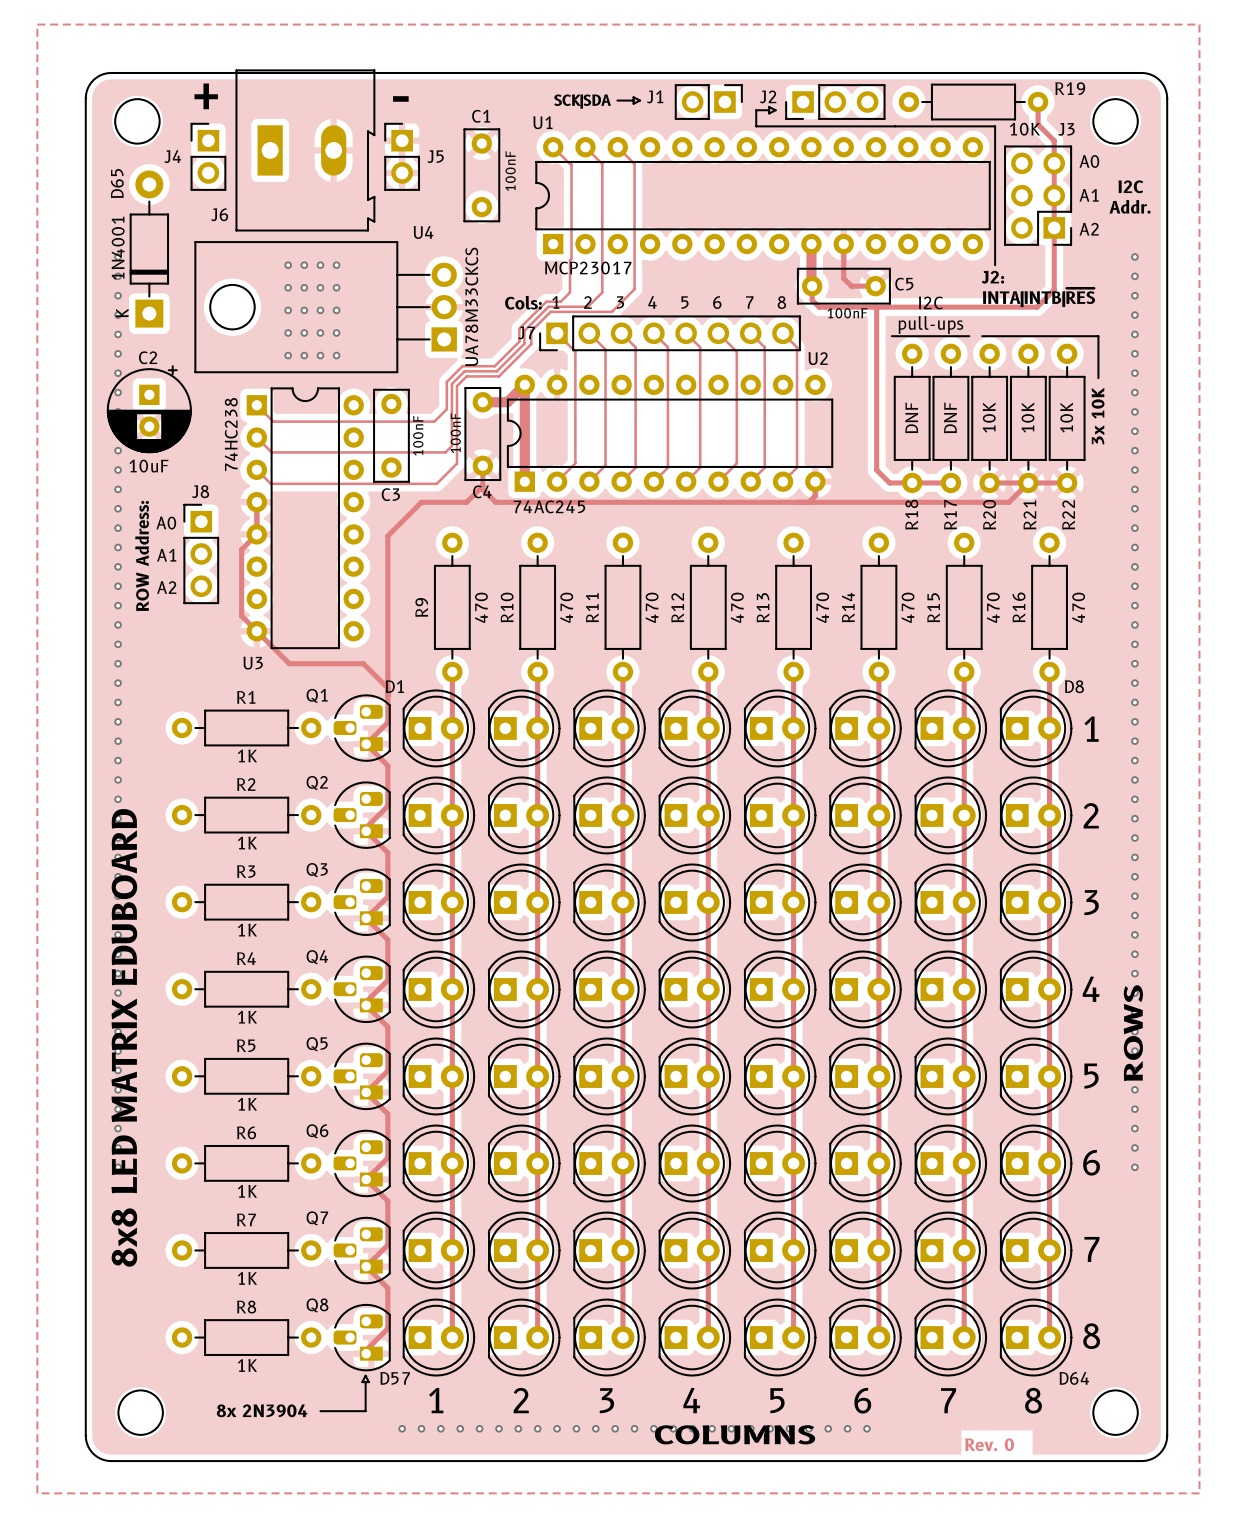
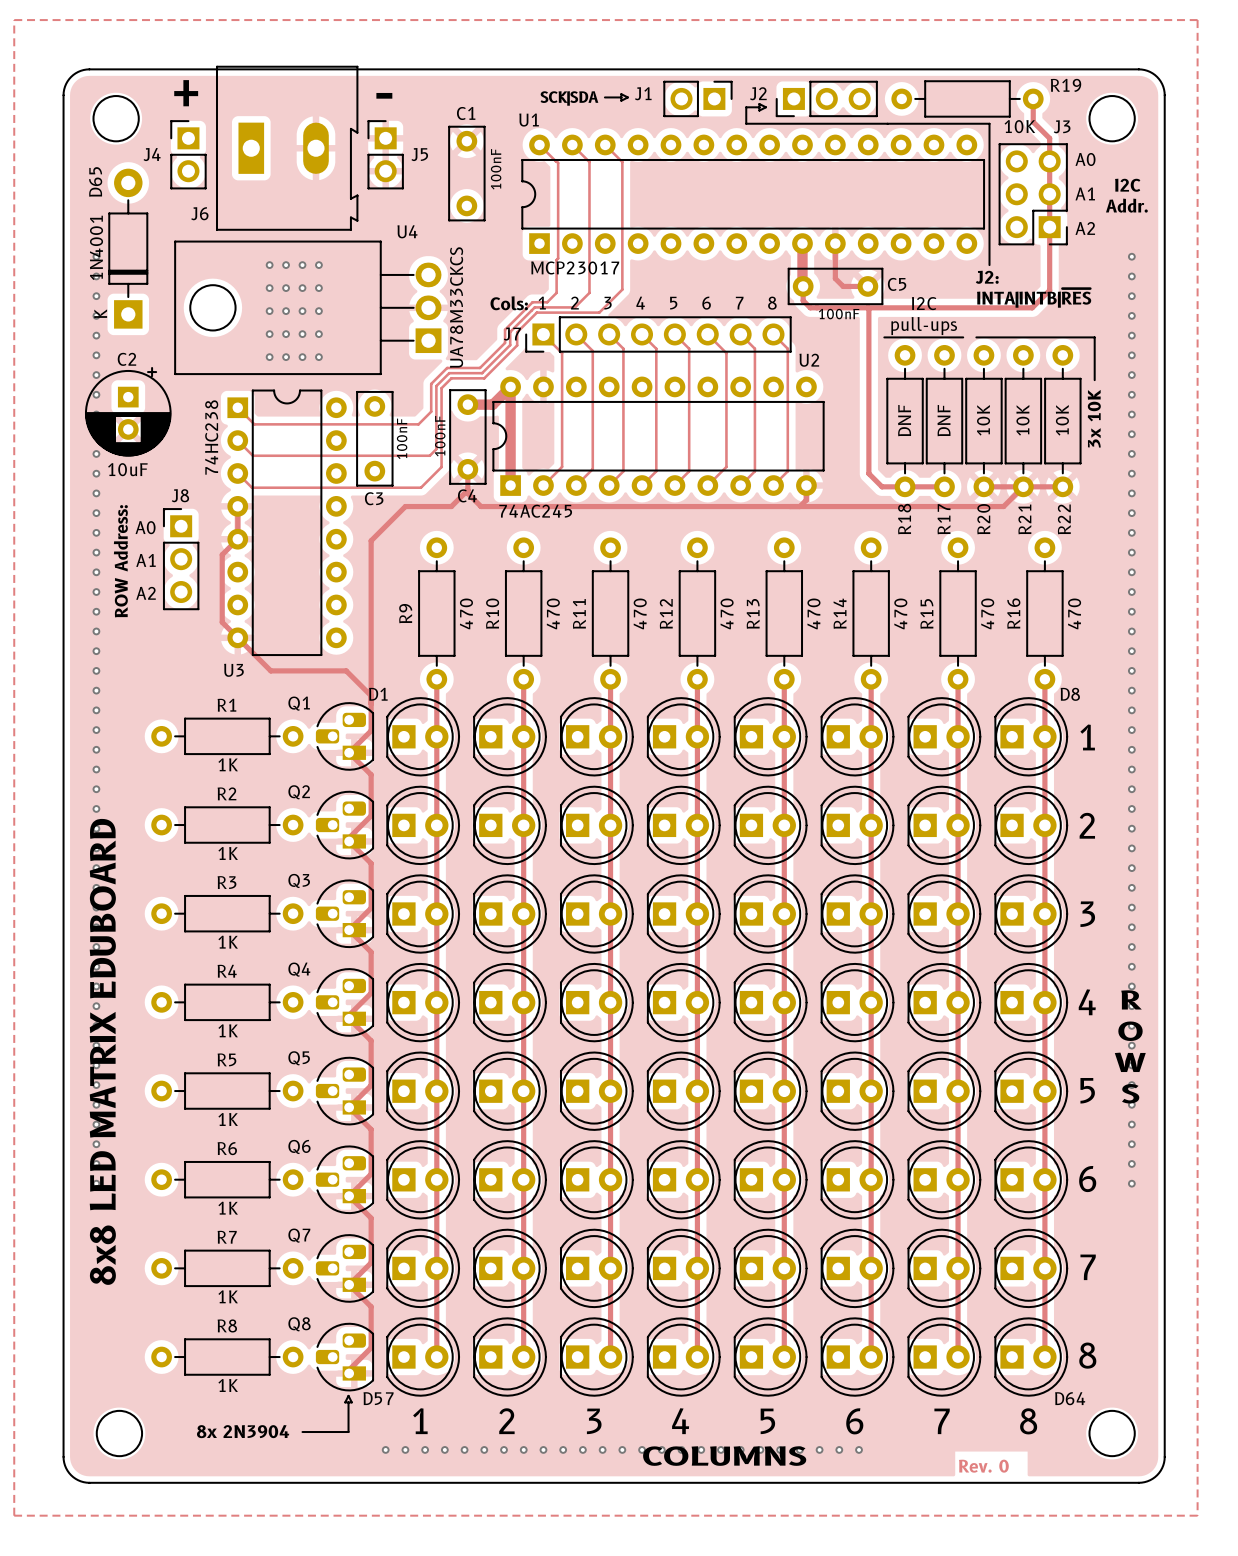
text: none -> R (1131, 999)
text: none -> O (1130, 1031)
text: ROWS (1133, 1033) -> none
text: none -> W (1130, 1062)
text: none -> S (1130, 1093)

